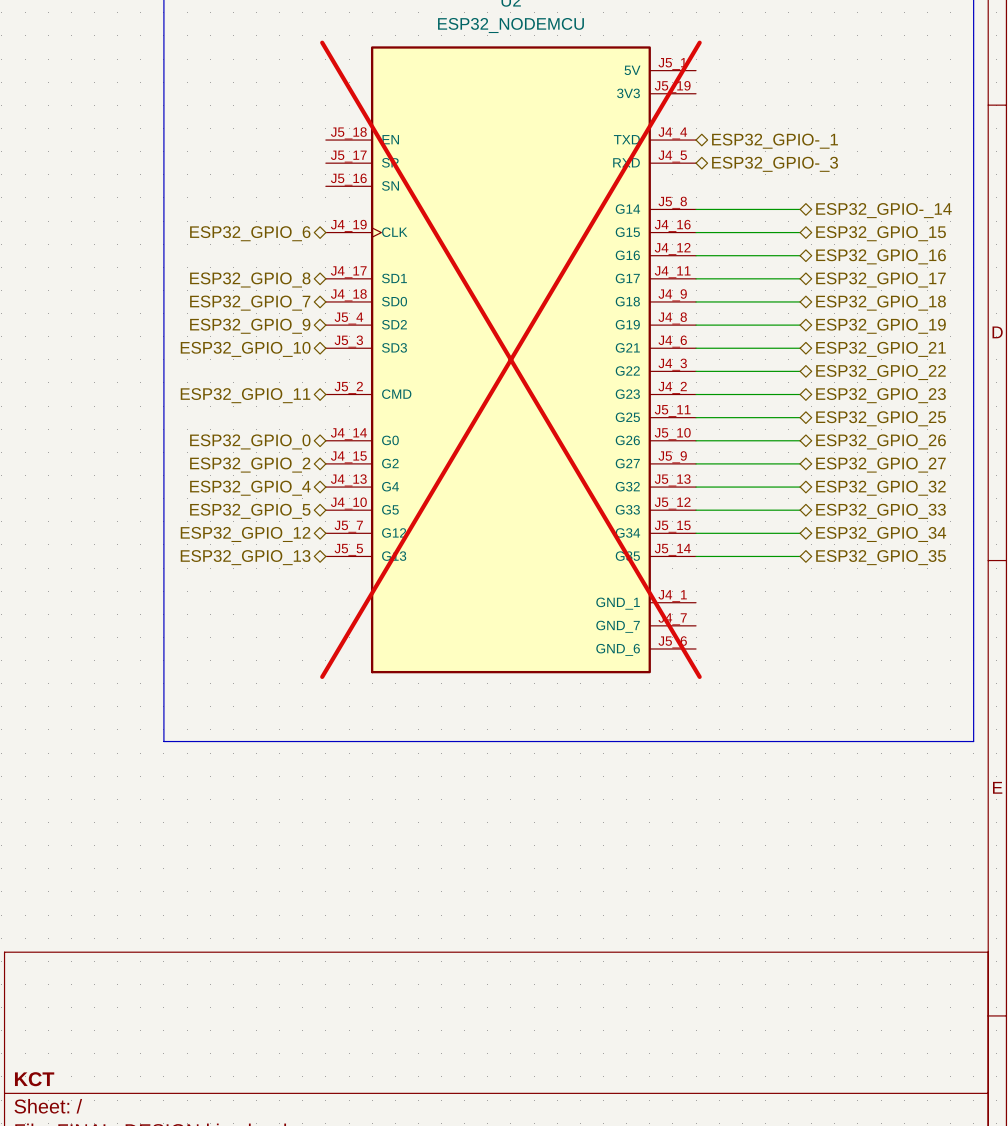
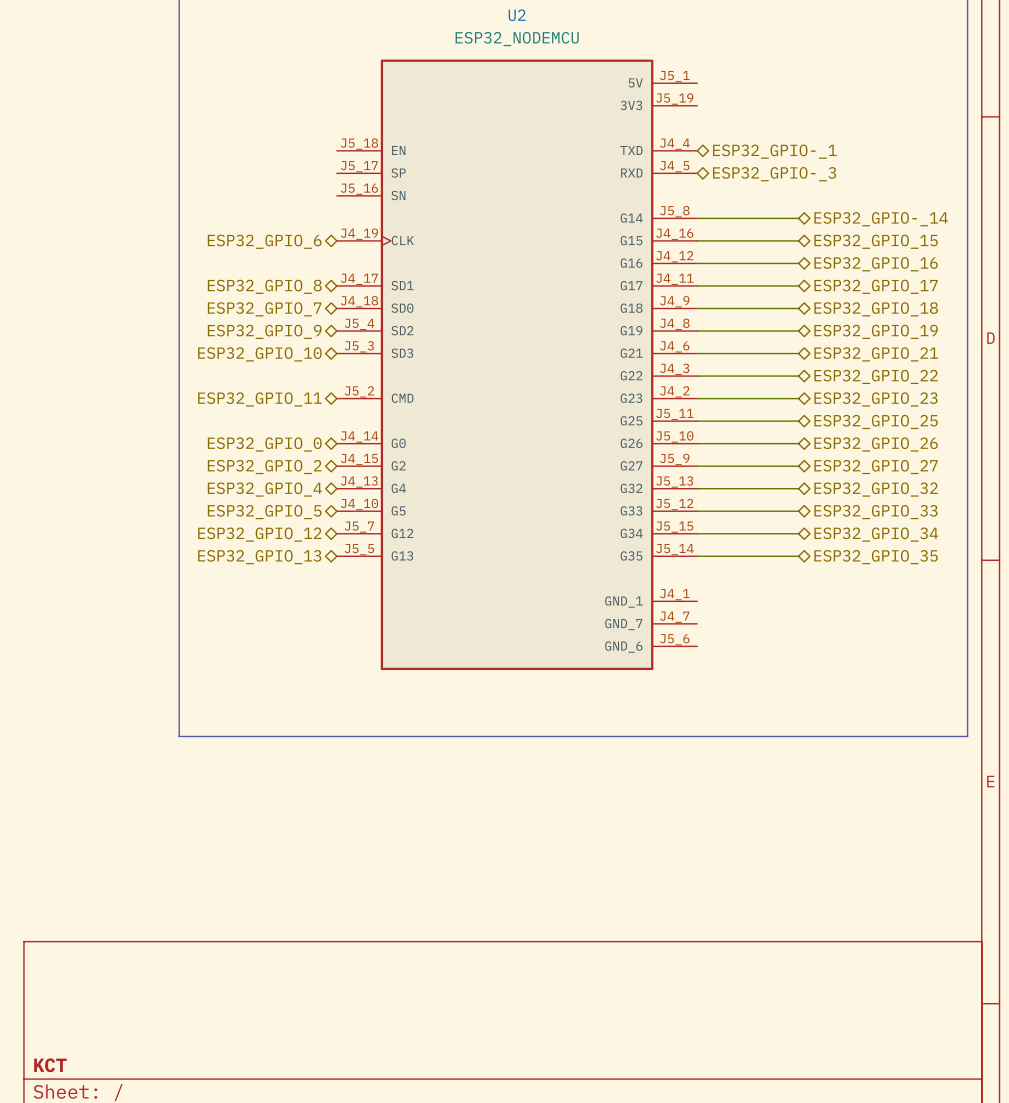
U2 do-not-place cross: (510, 359) -> none

